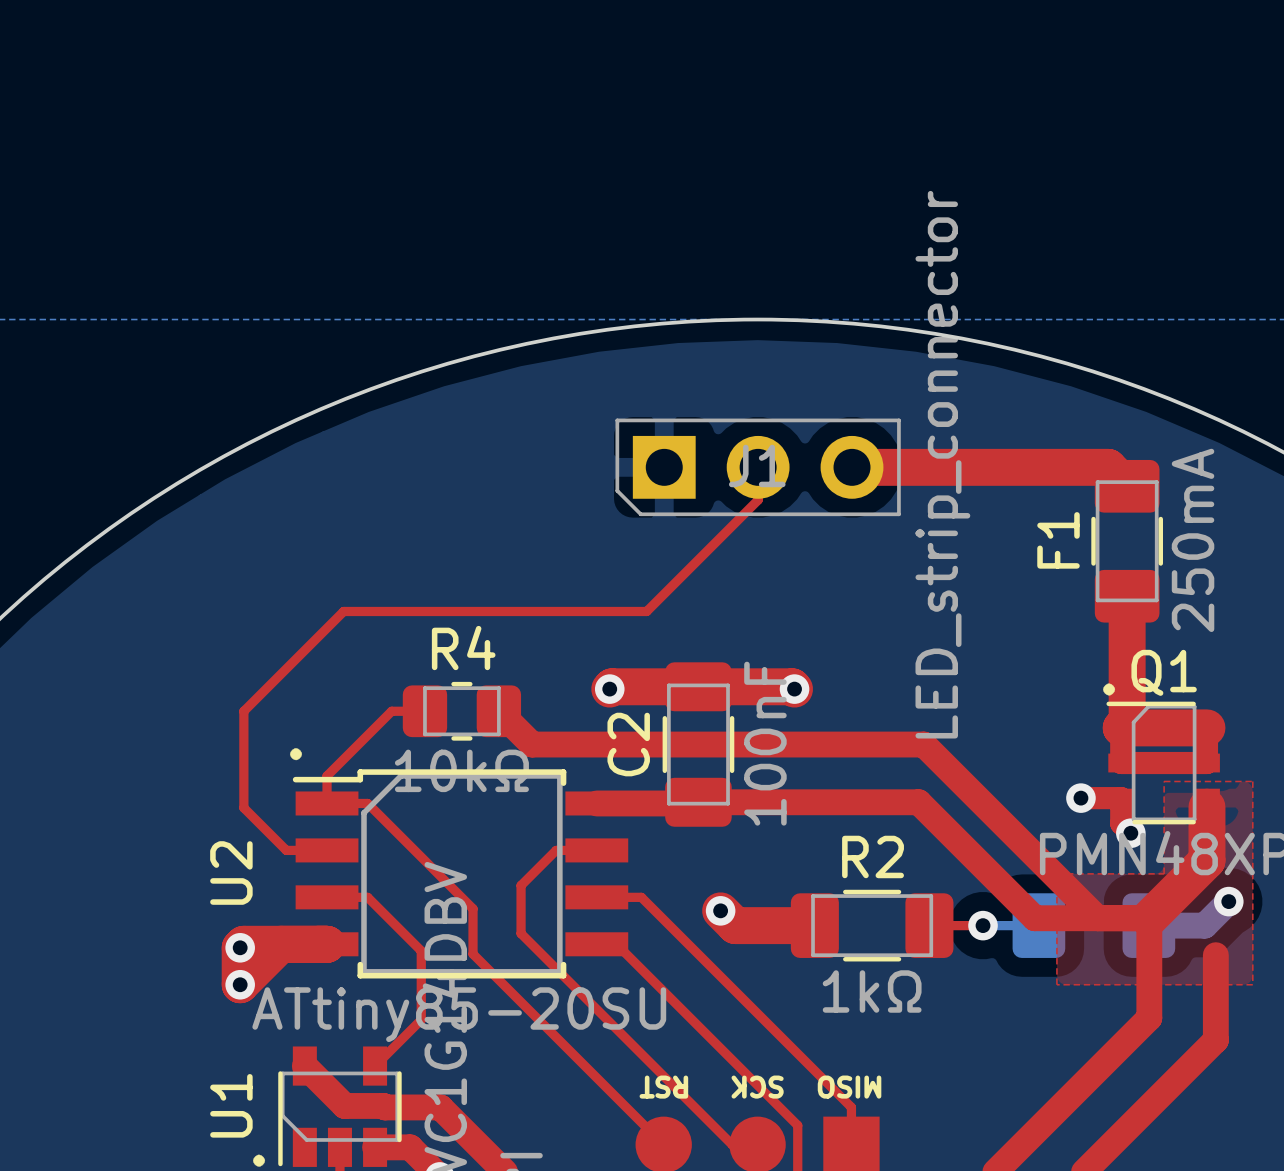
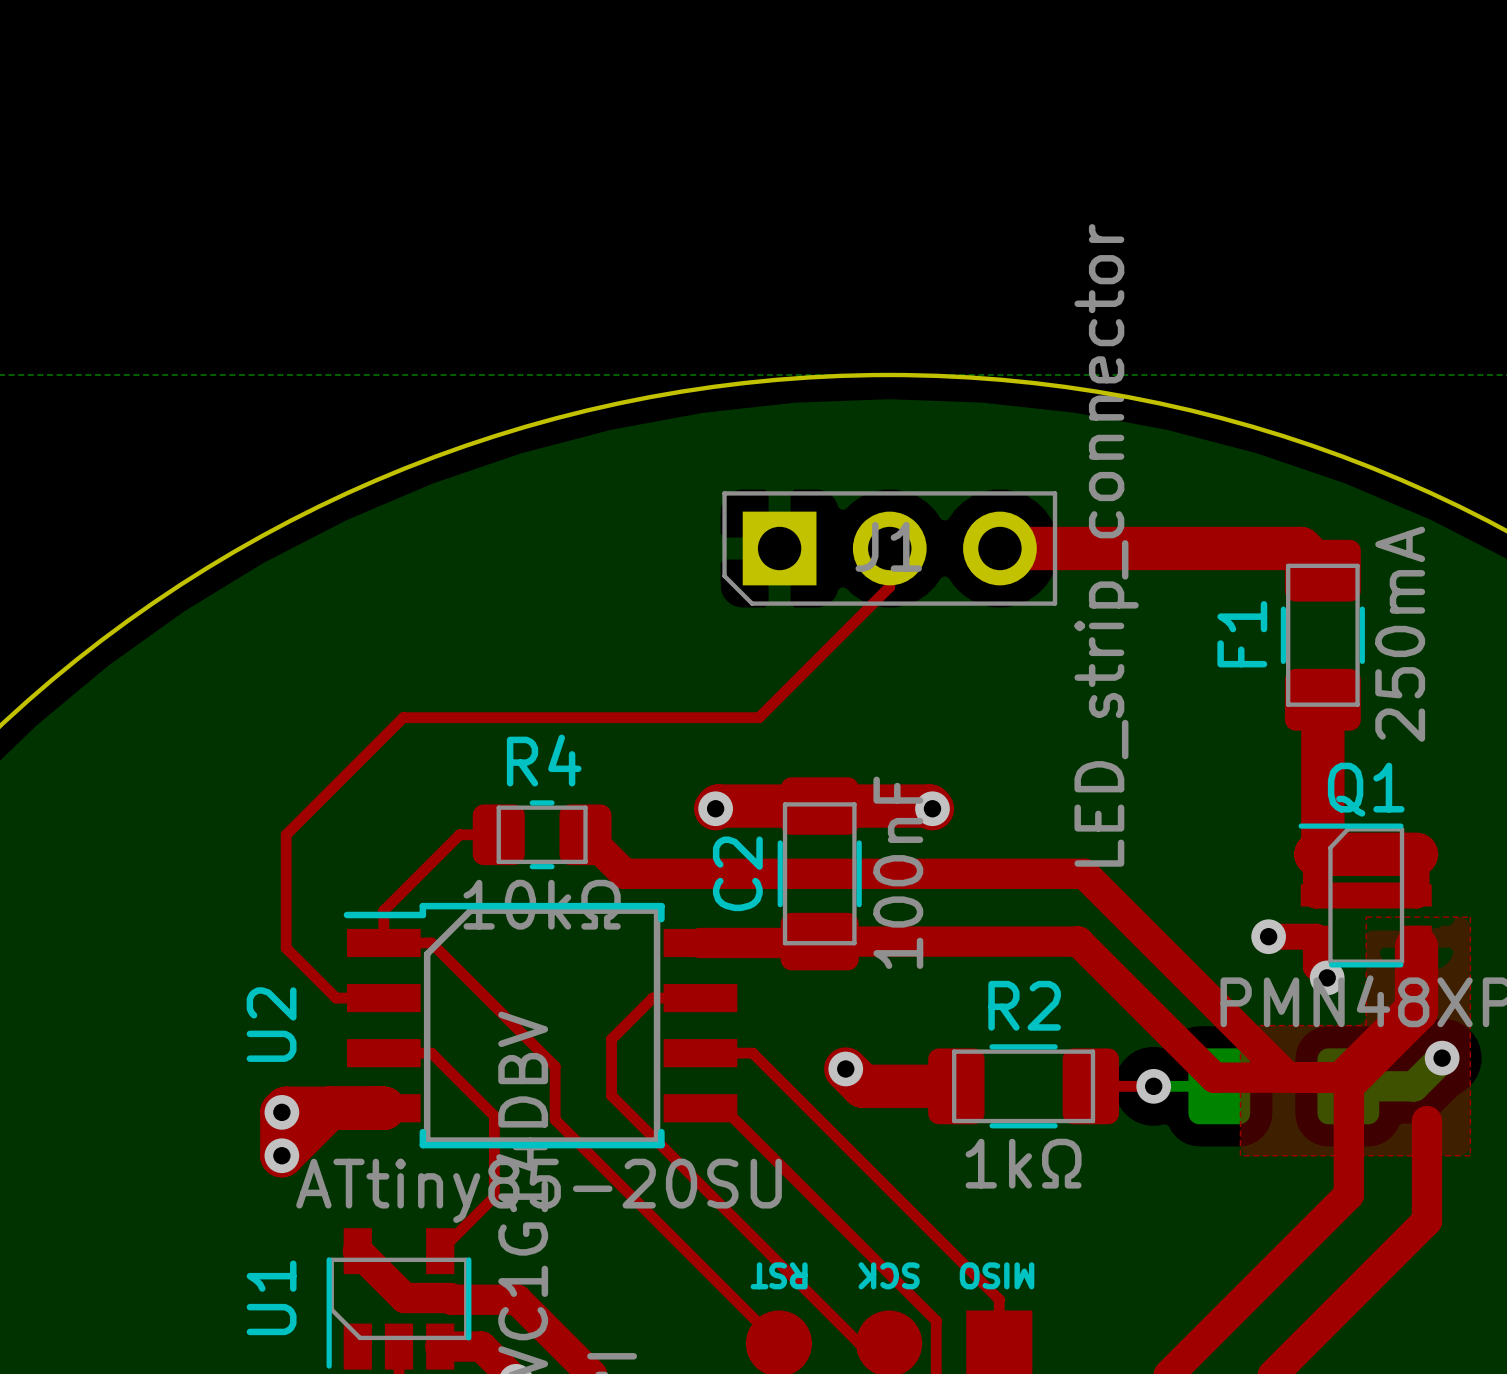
drawing: [1103, 683, 1116, 696] -> none
drawing: [289, 748, 303, 761] -> none
drawing: [253, 1154, 266, 1167] -> none

